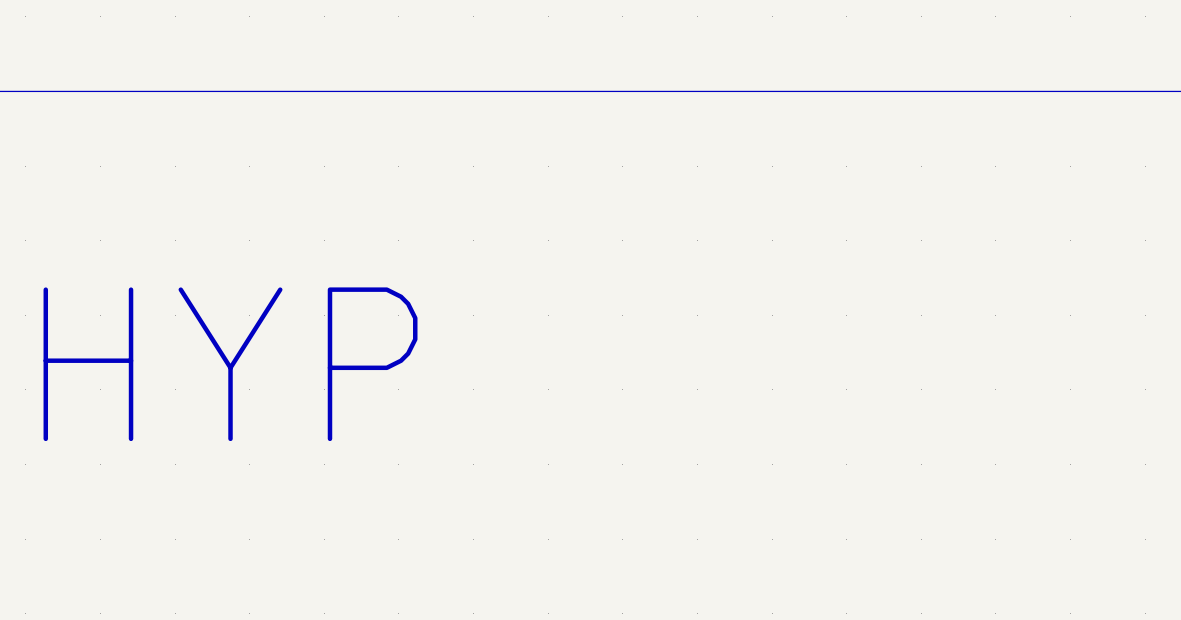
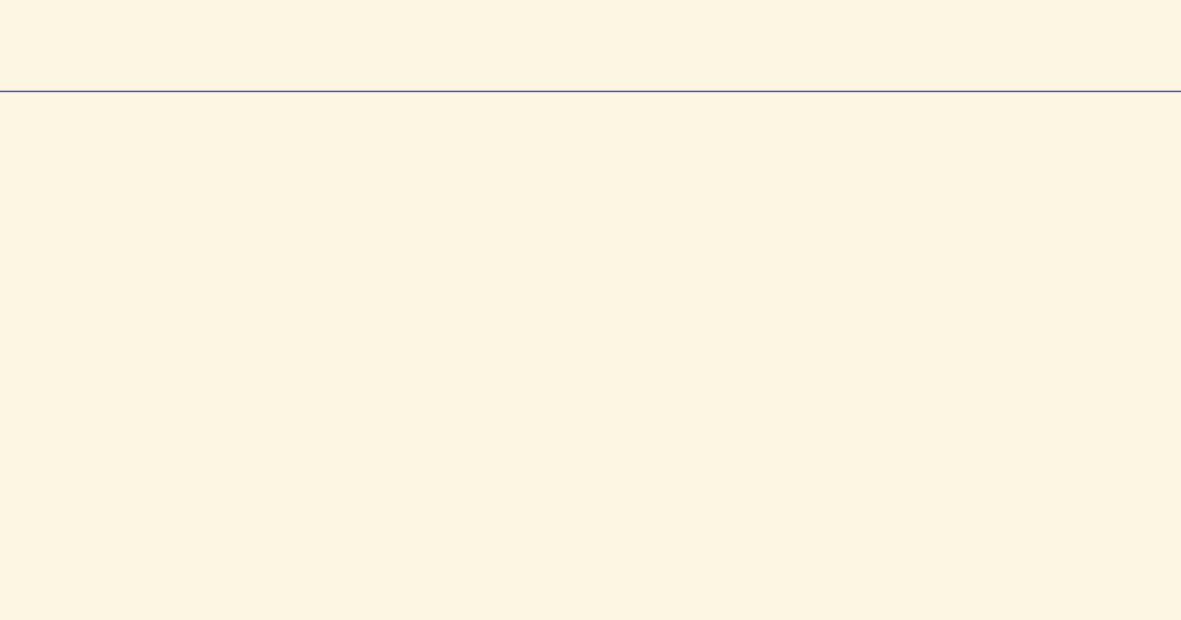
text: HYP (230, 364) -> none

